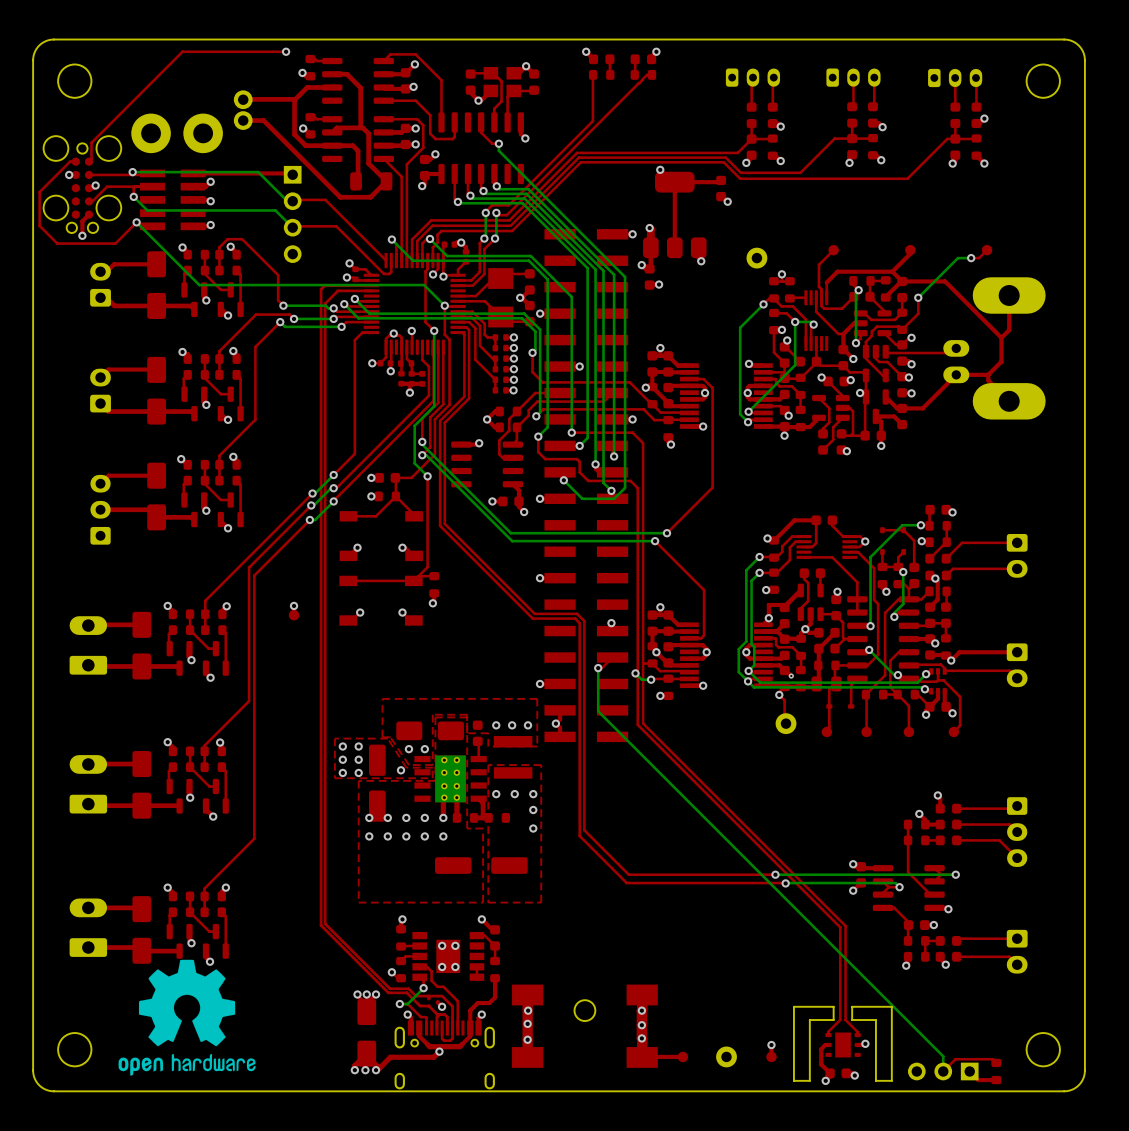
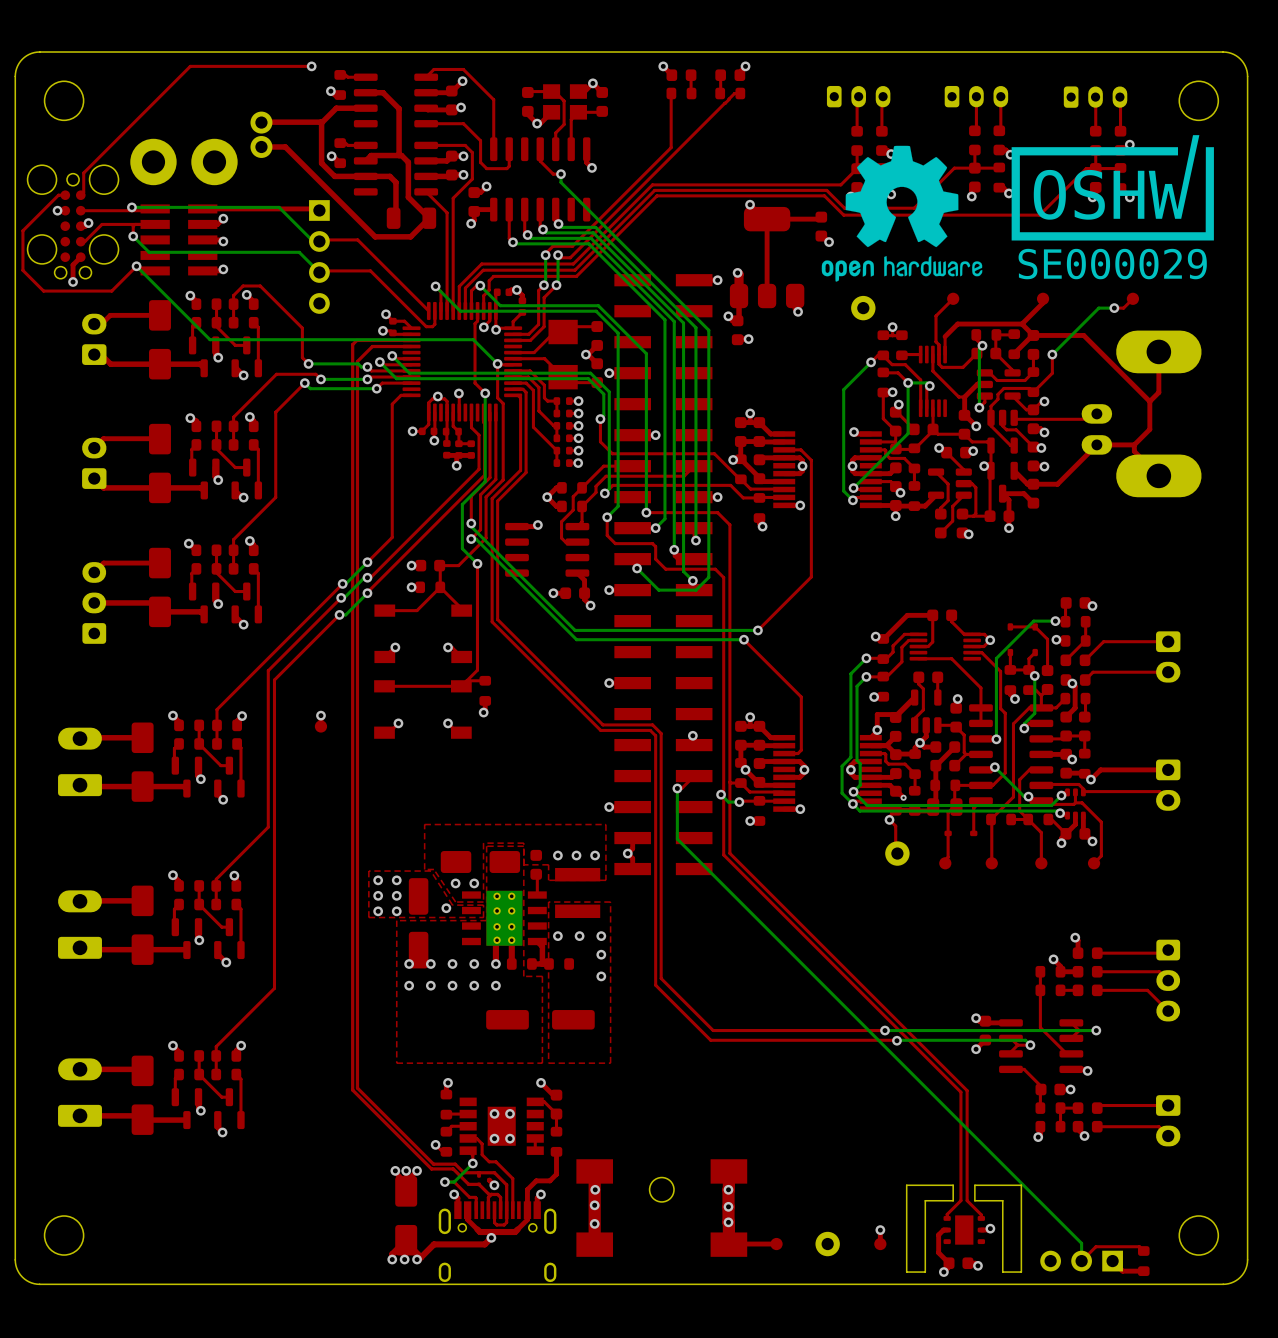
drawing: none -> [1011, 135, 1214, 280]
drawing: none -> [821, 145, 983, 282]
drawing: [118, 959, 256, 1076] -> none

